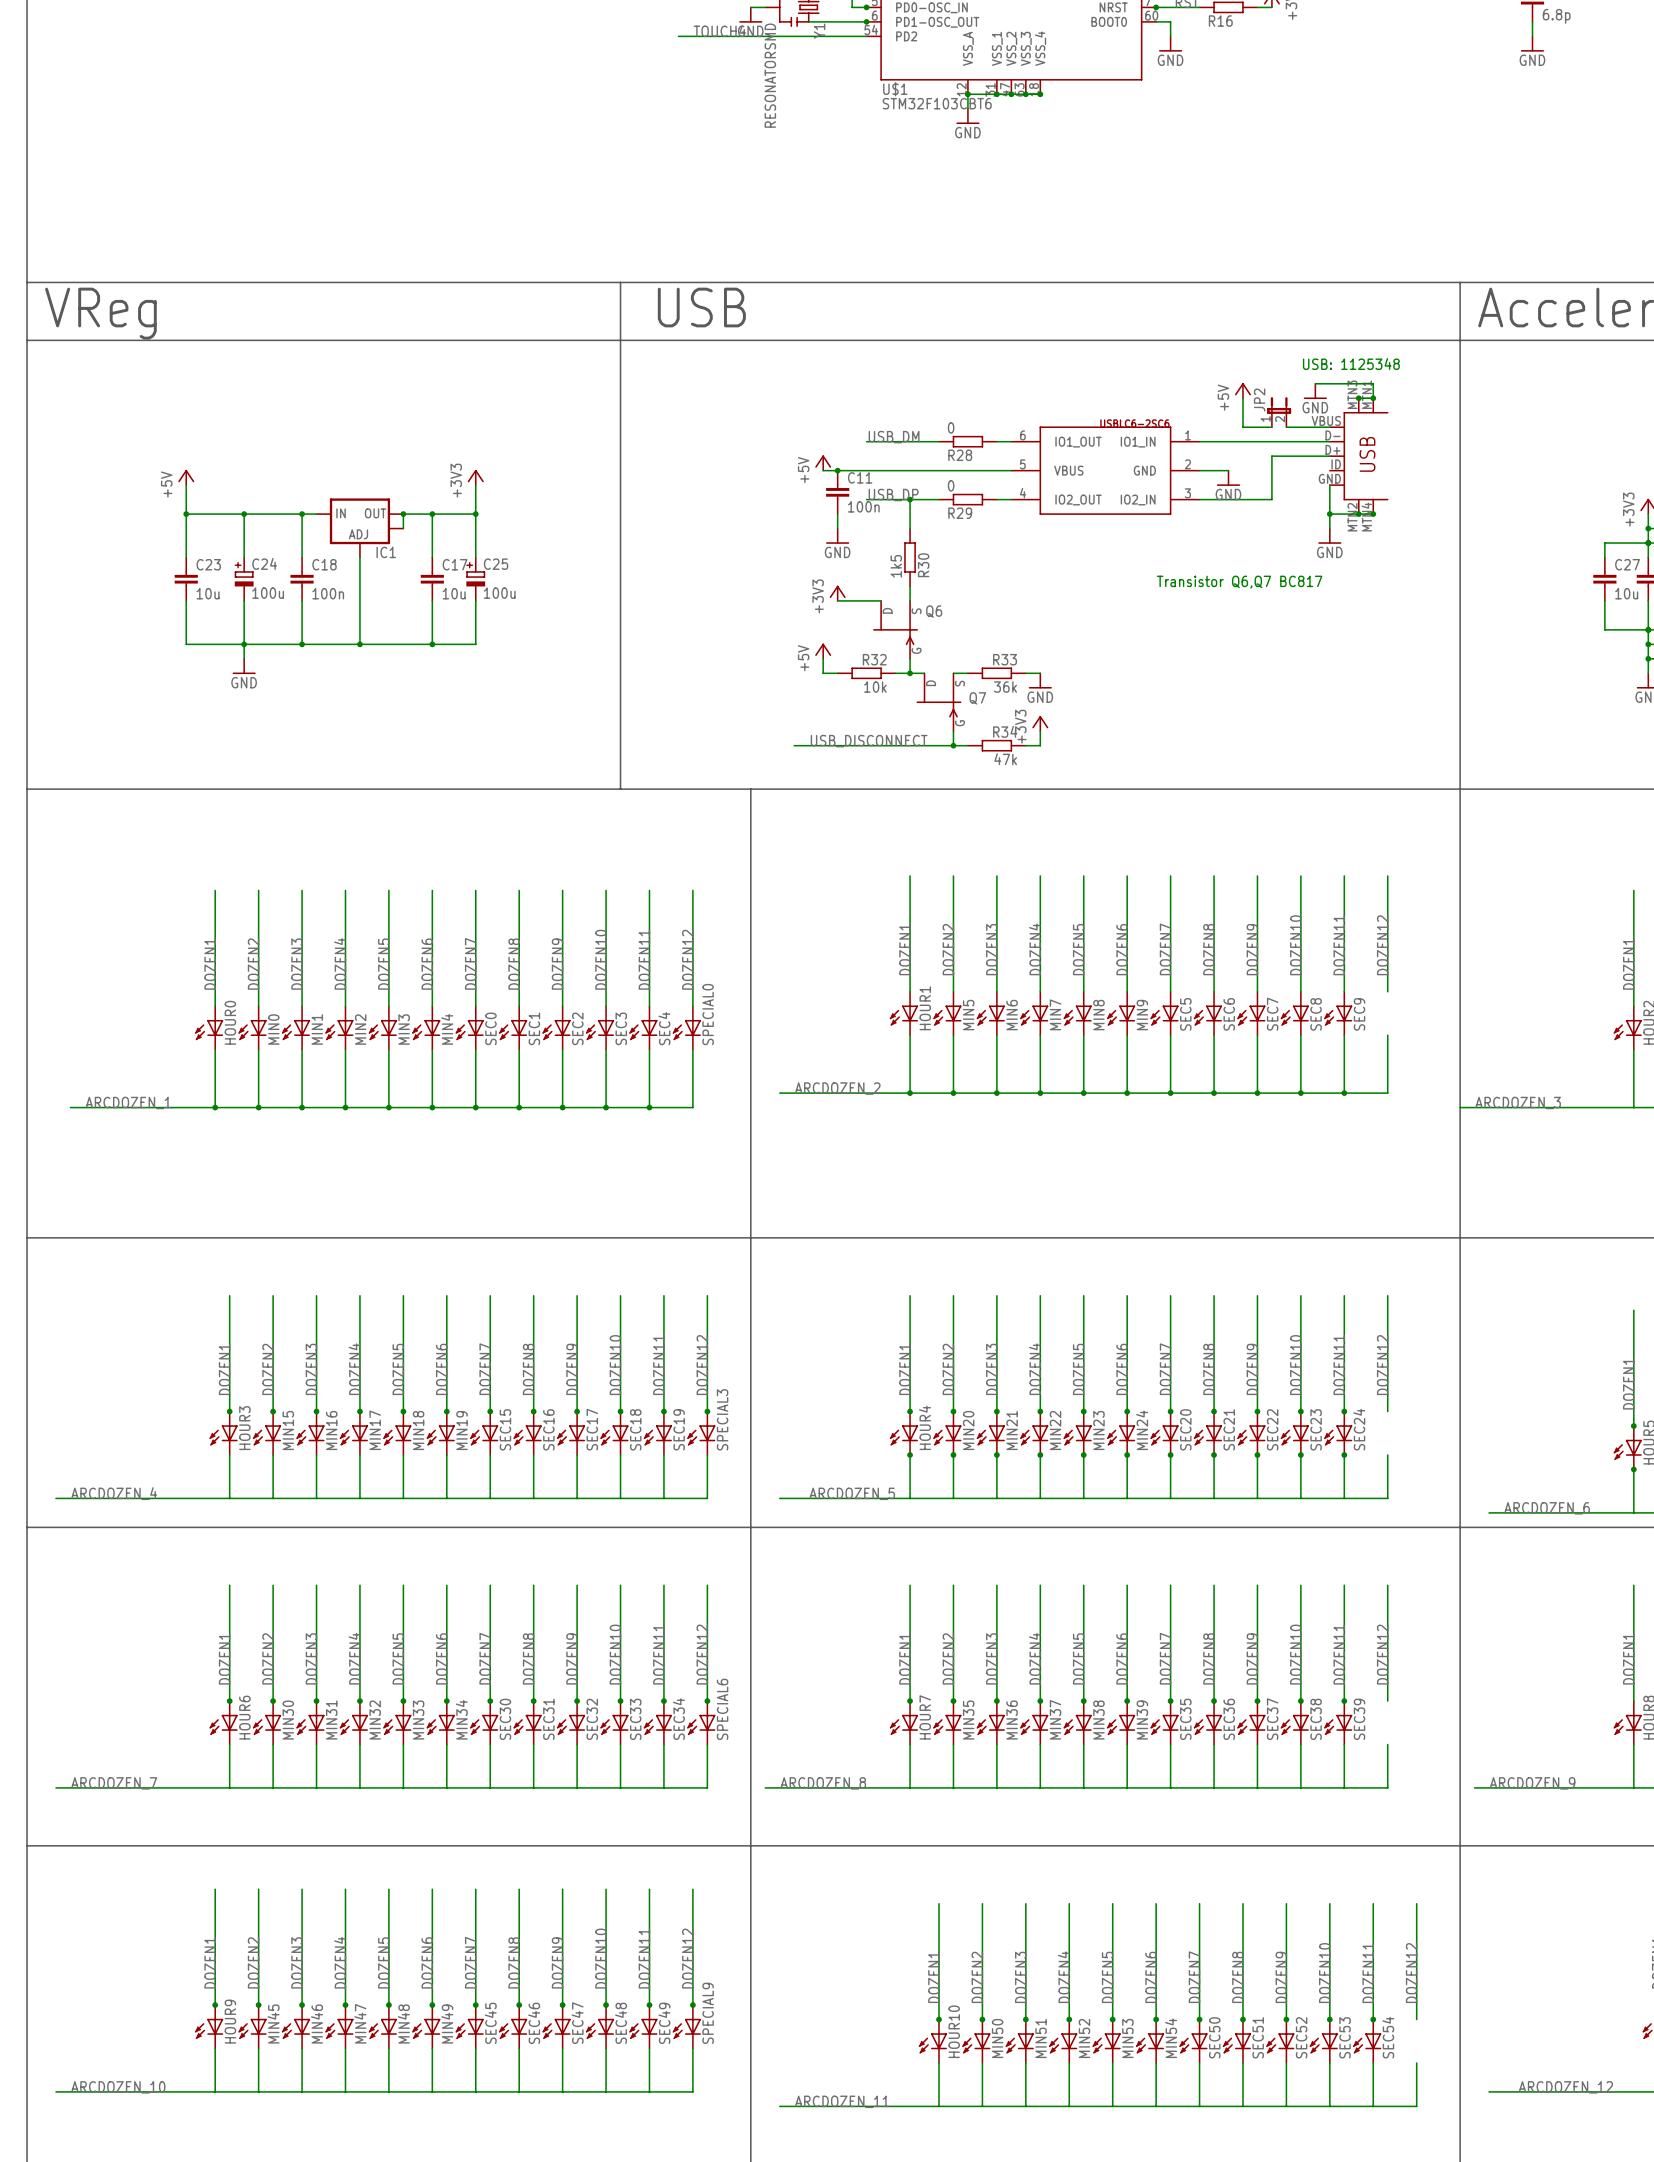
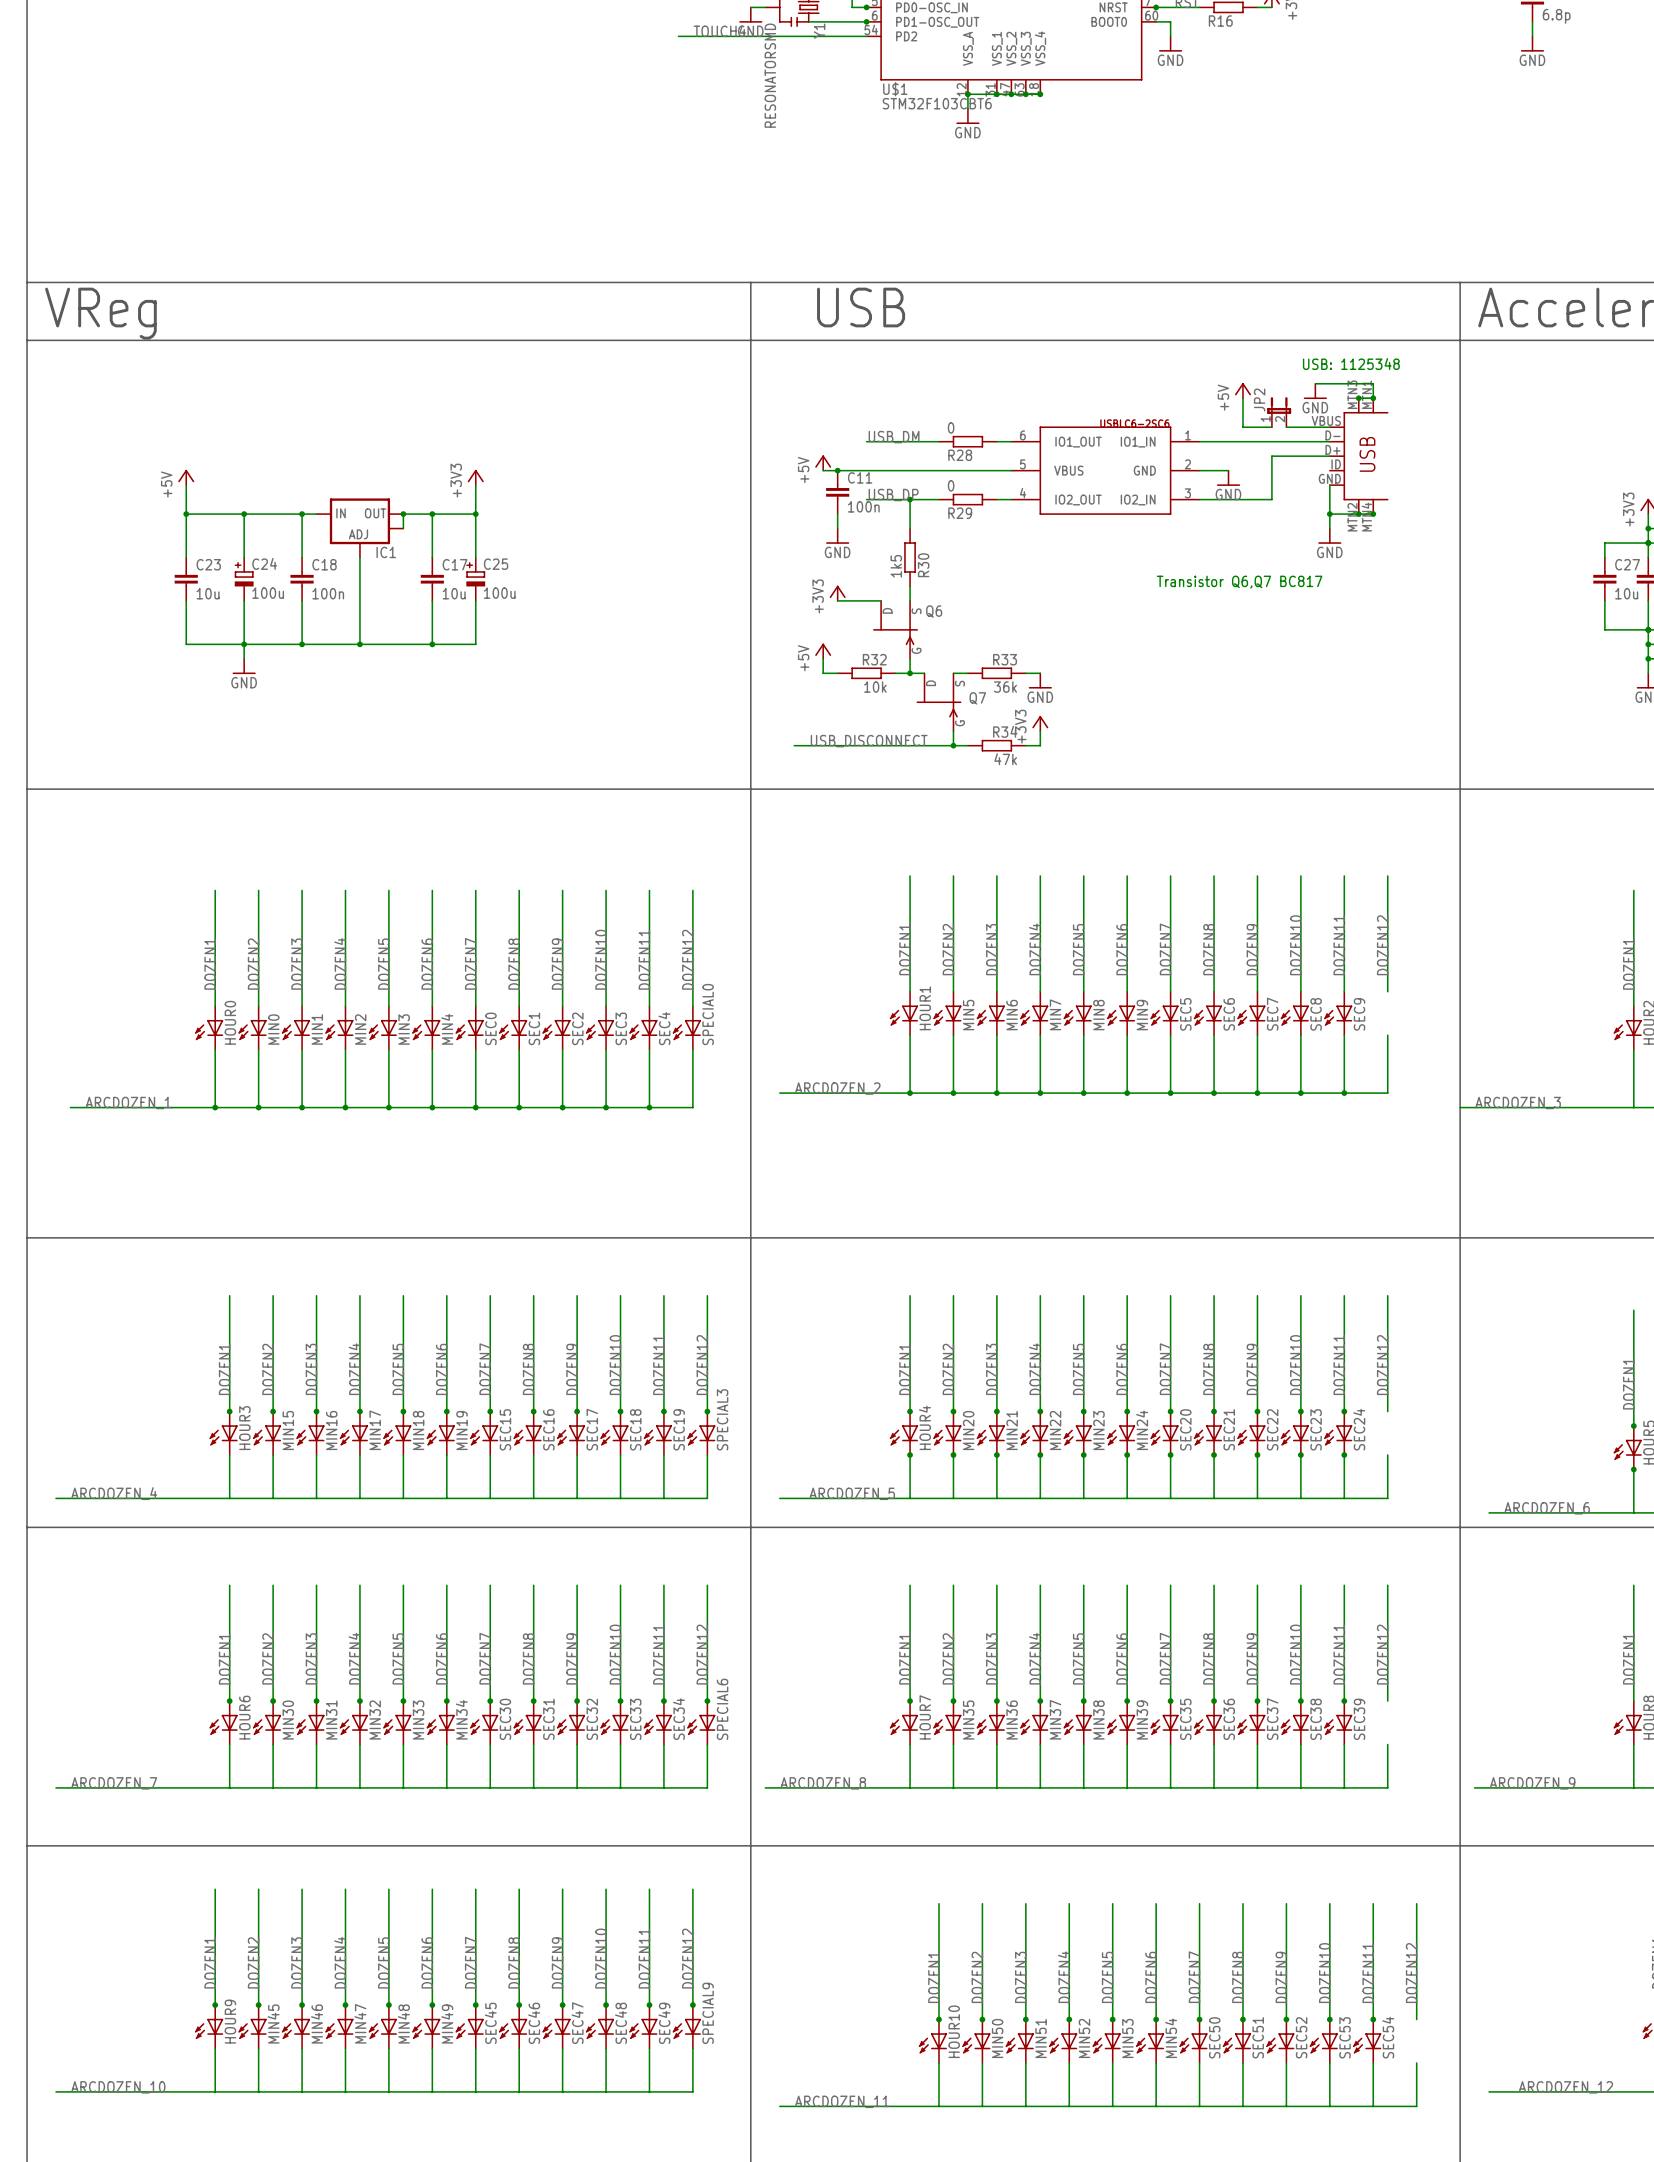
line: (620, 282) (620, 789) -> (750, 282) (750, 789)
text: USB (701, 307) -> none
text: none -> USB (861, 307)

